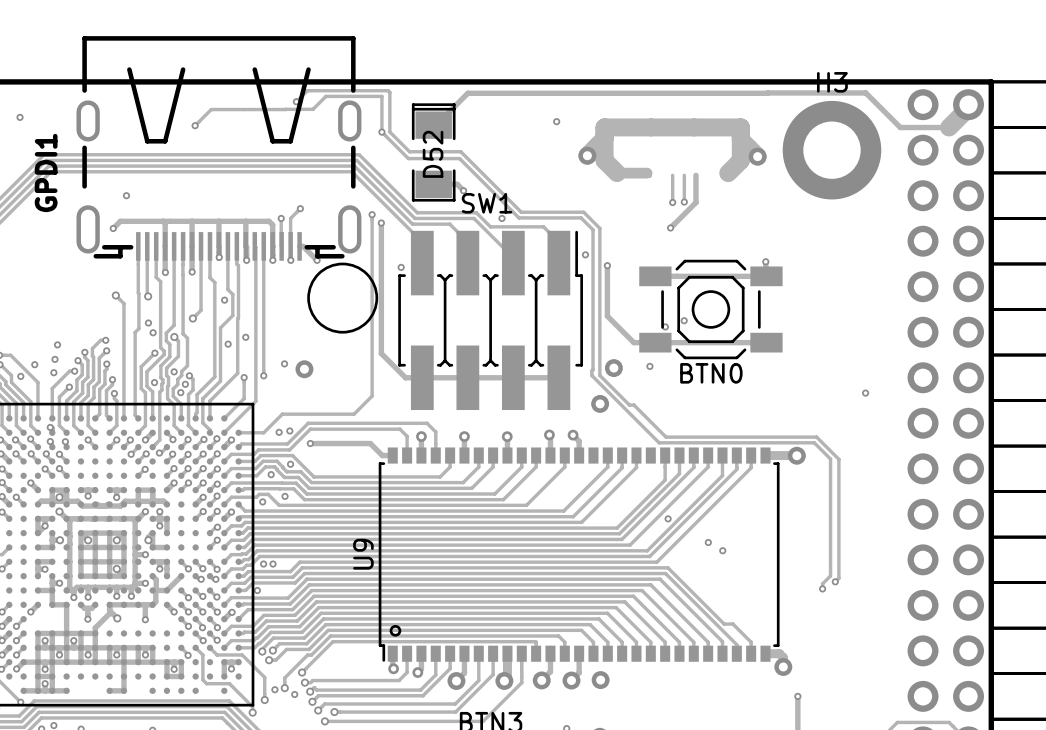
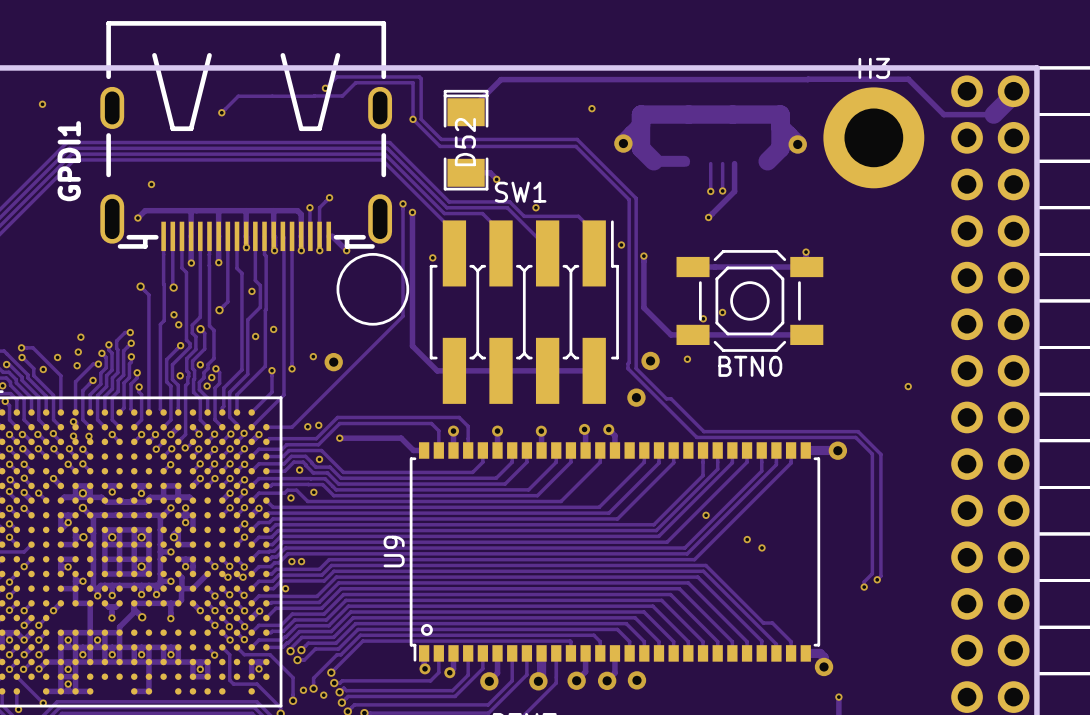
track: (460, 151) (521, 212) (583, 212) (599, 228) -> (493, 139) (577, 139) (636, 198) (636, 217)
track: (459, 158) (518, 217) (581, 217) (593, 229) -> (492, 146) (575, 146) (629, 199) (629, 219)
track: (372, 324) (372, 396) (354, 414) (282, 414) -> (403, 316) (311, 408)

